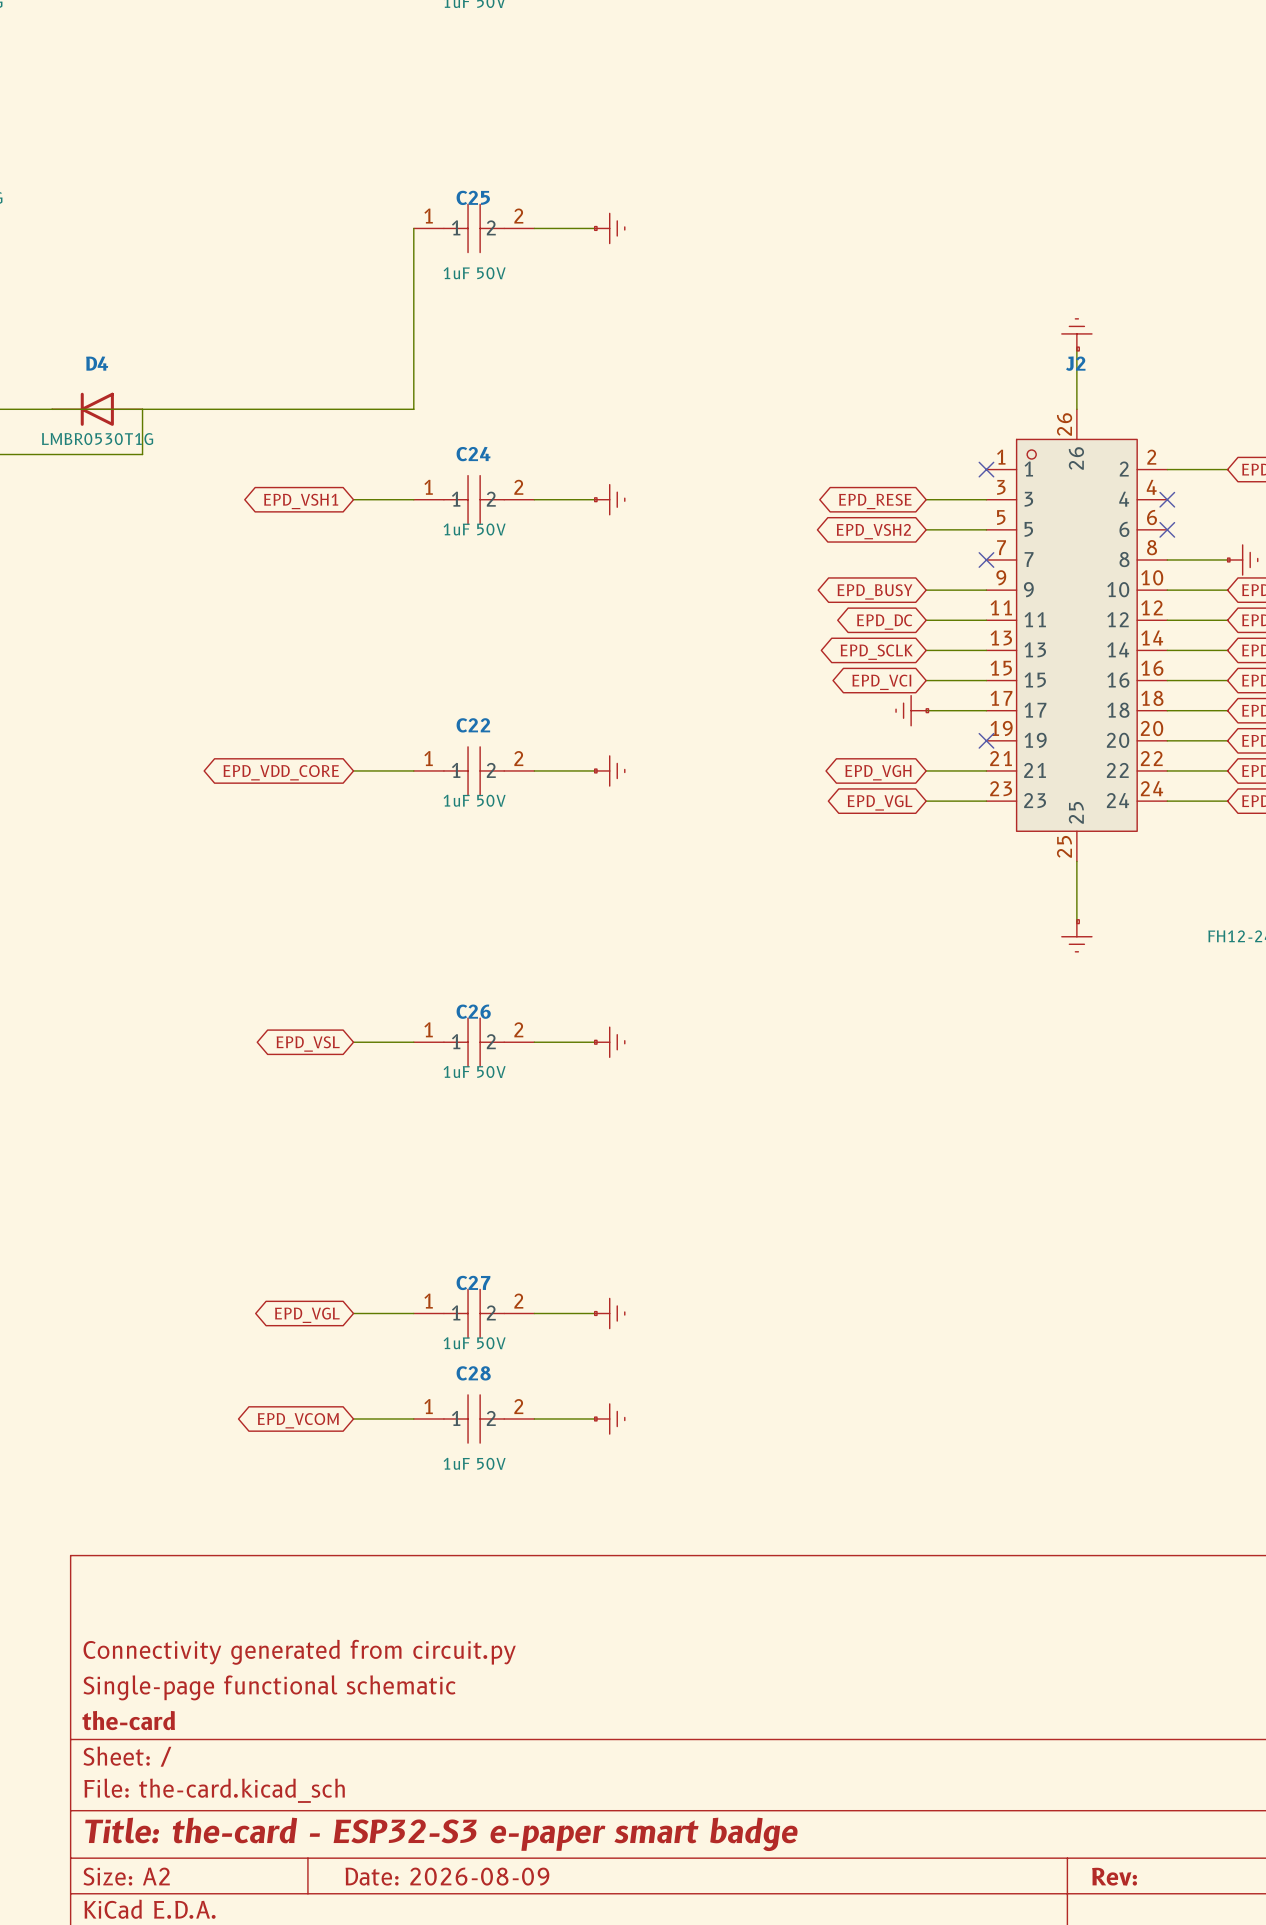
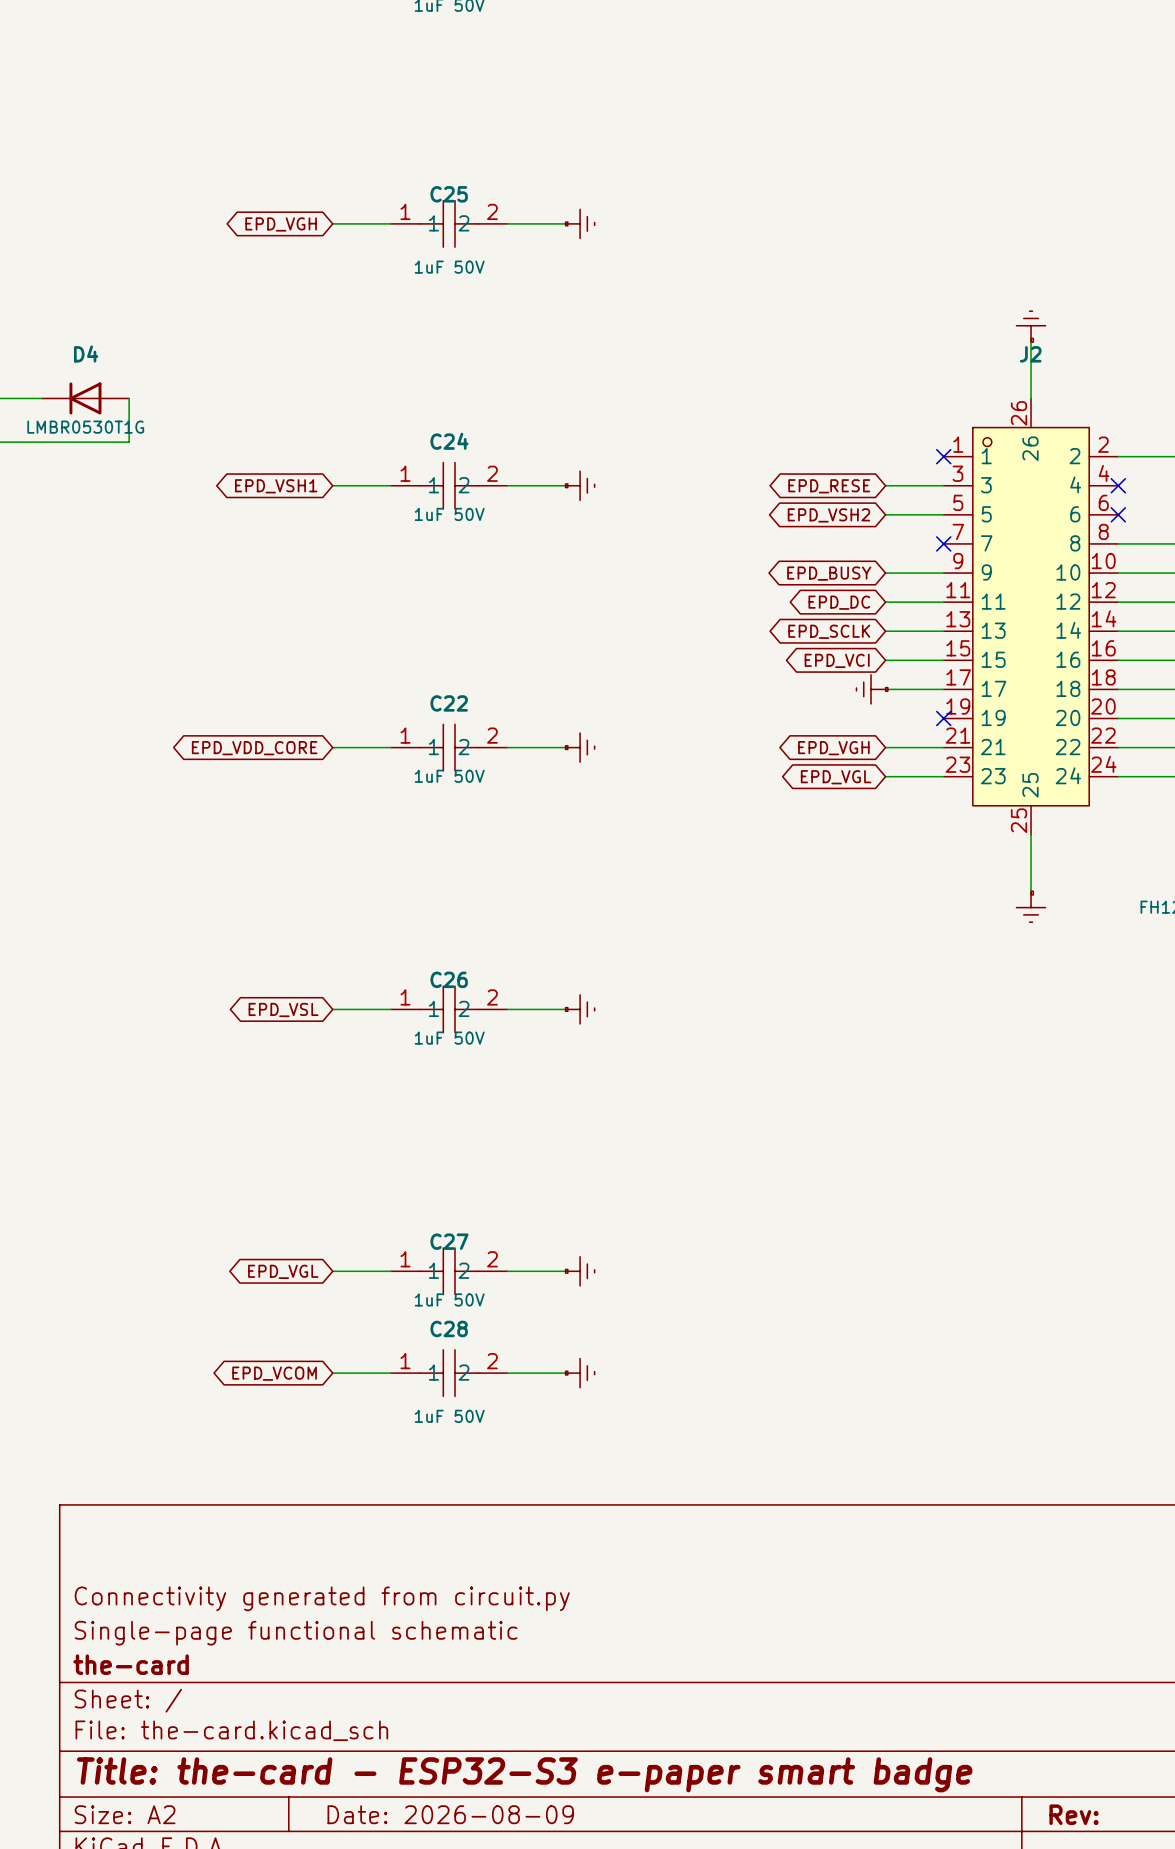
wire: (413, 228) (413, 409) (52, 409) -> (390, 223) (332, 223)
global label: none -> EPD_VGH (281, 224)

